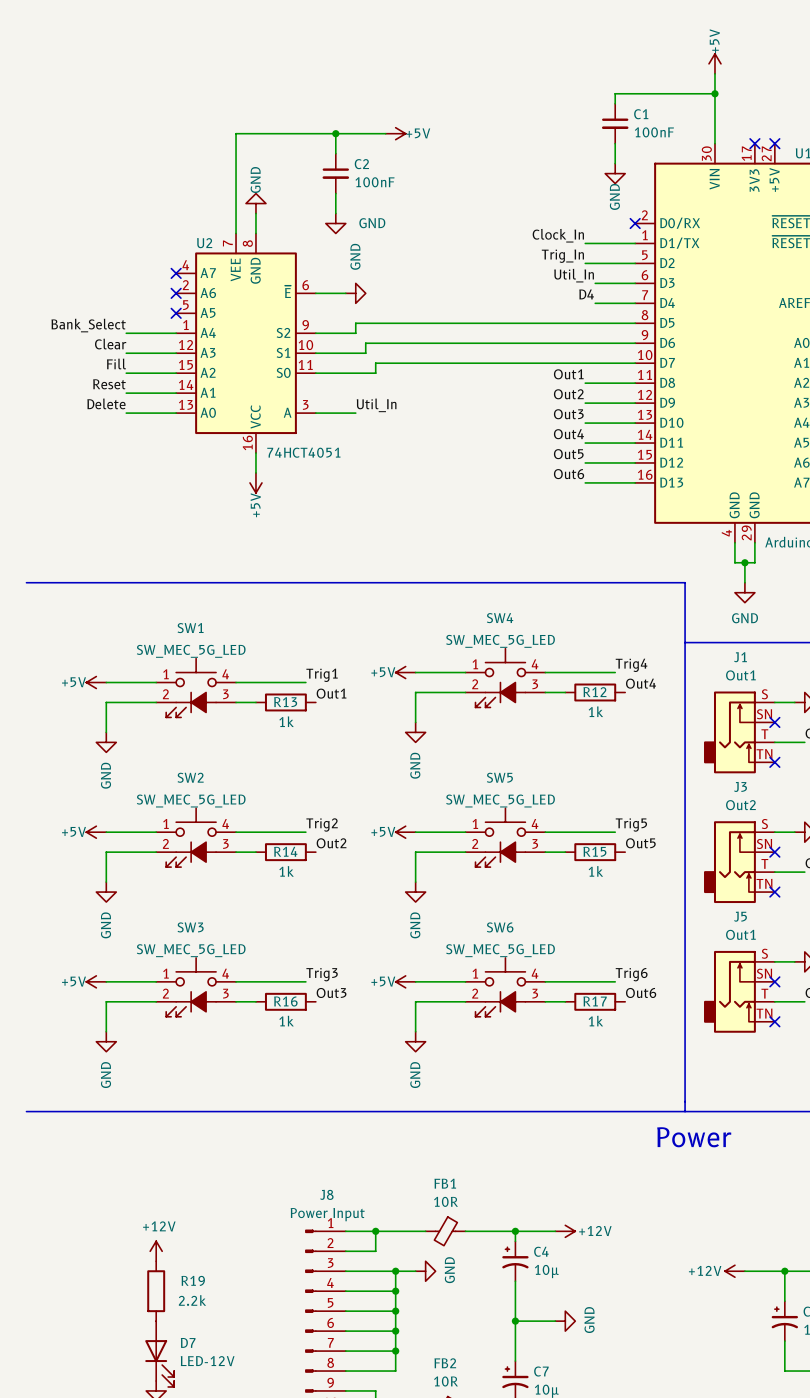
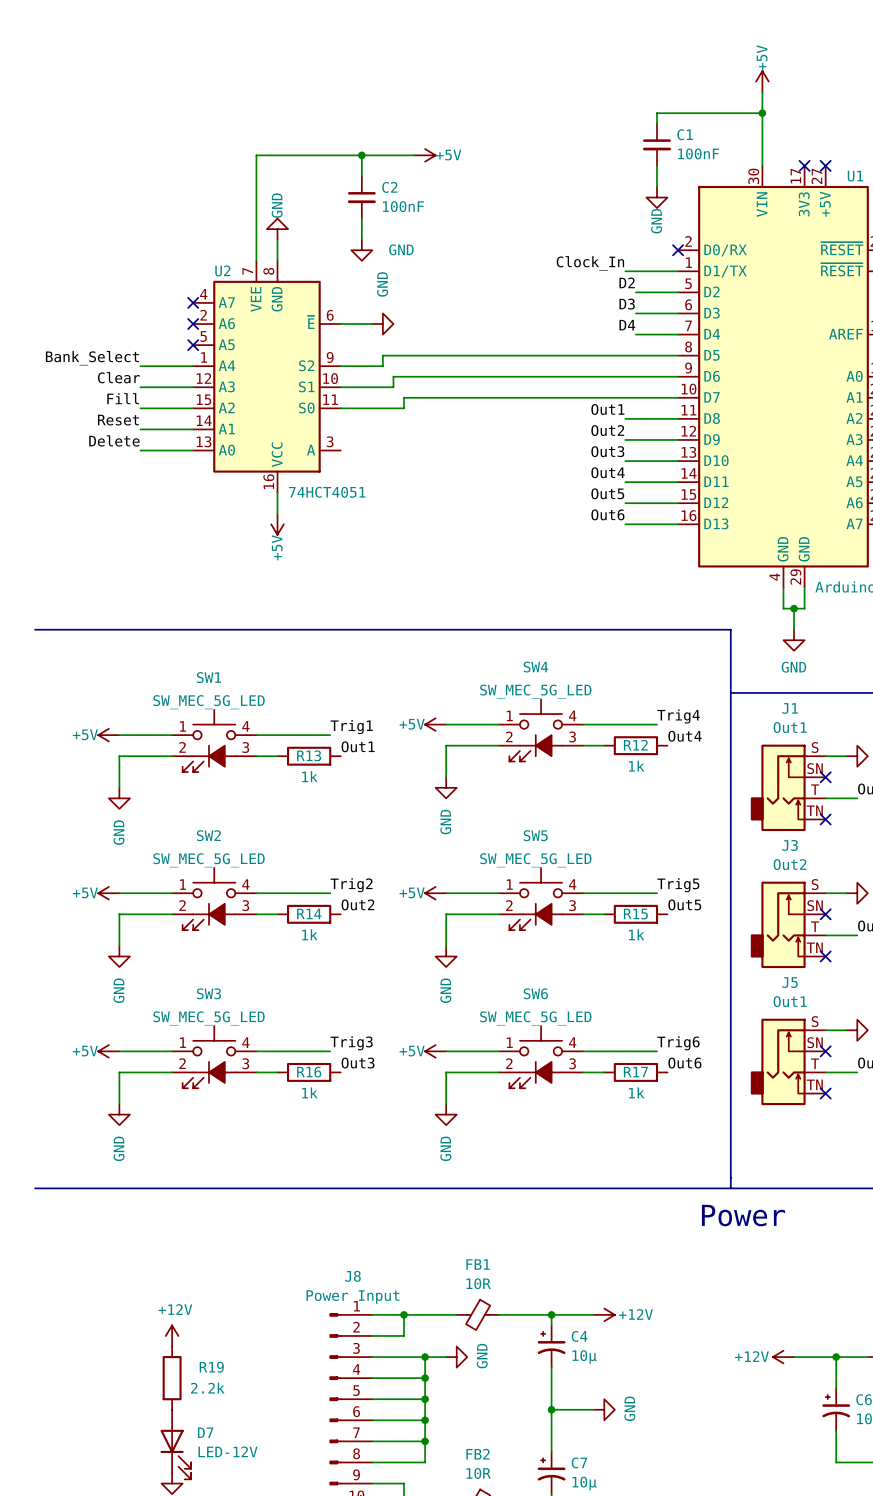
label: none -> D2 (627, 282)
label: Trig_In (562, 256) -> none
wire: (585, 263) (595, 263) -> none
label: Util_In (574, 275) -> D3 (627, 304)
label: Util_In (376, 405) -> none
wire: (315, 413) (355, 413) -> none

